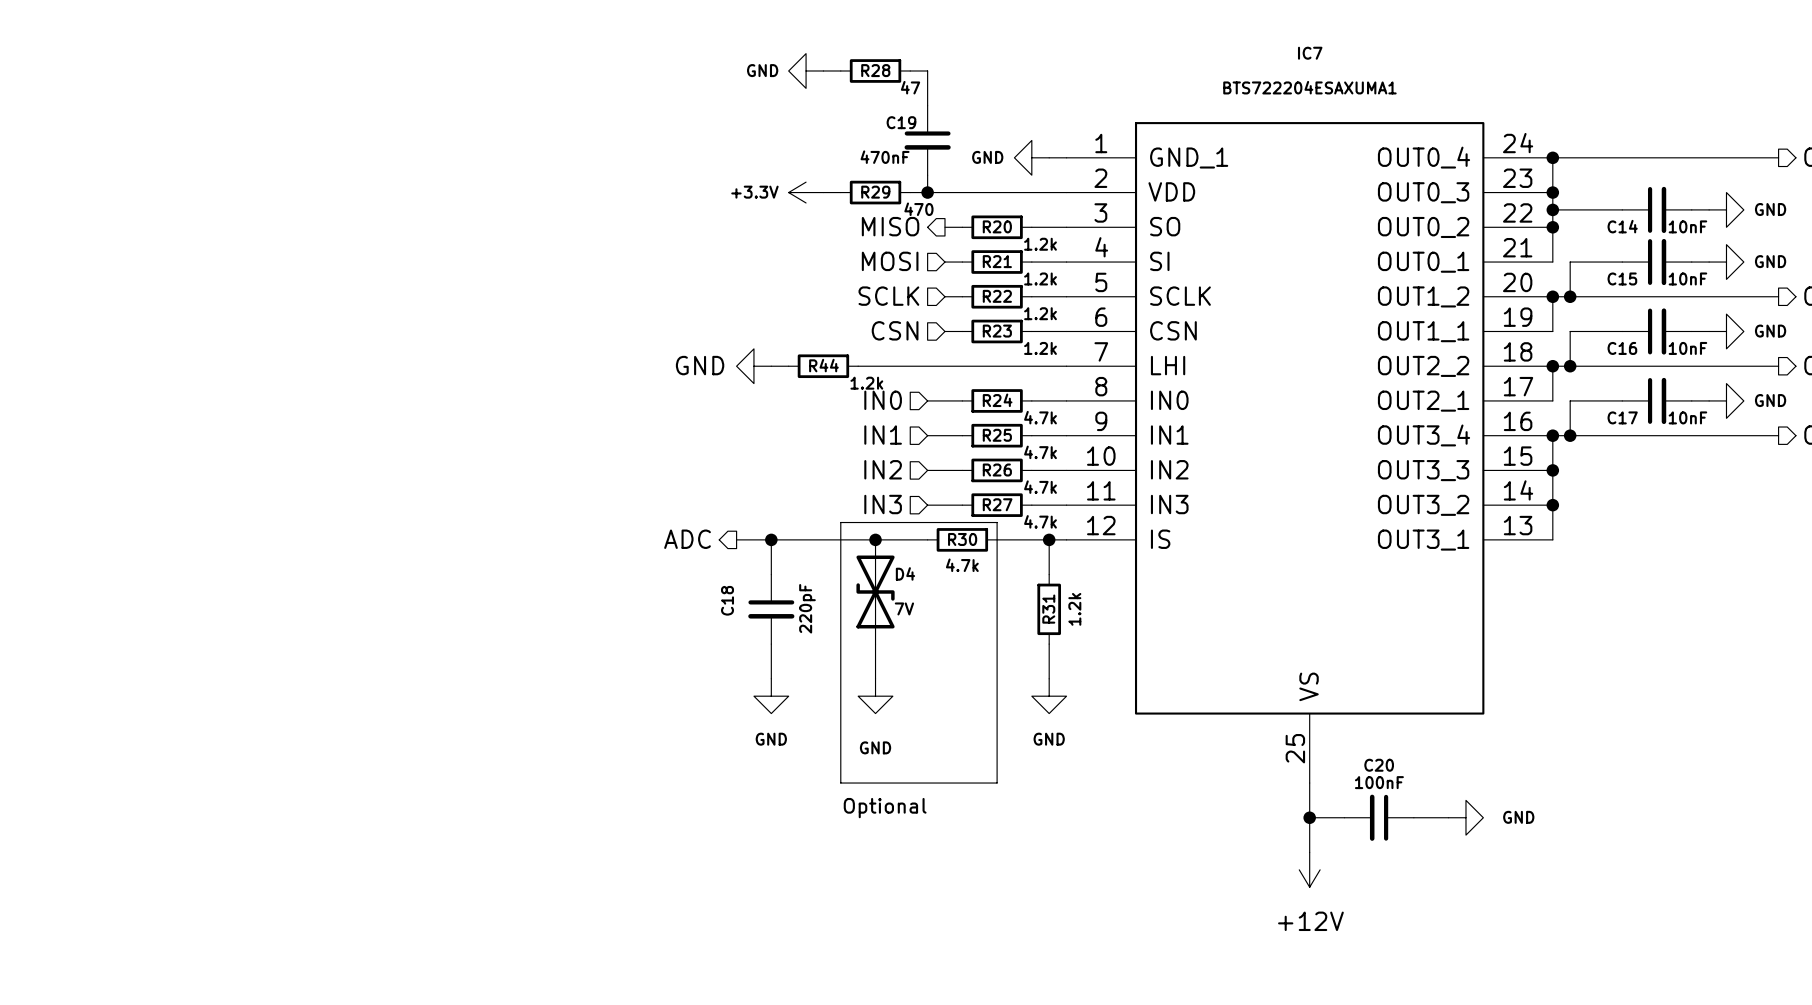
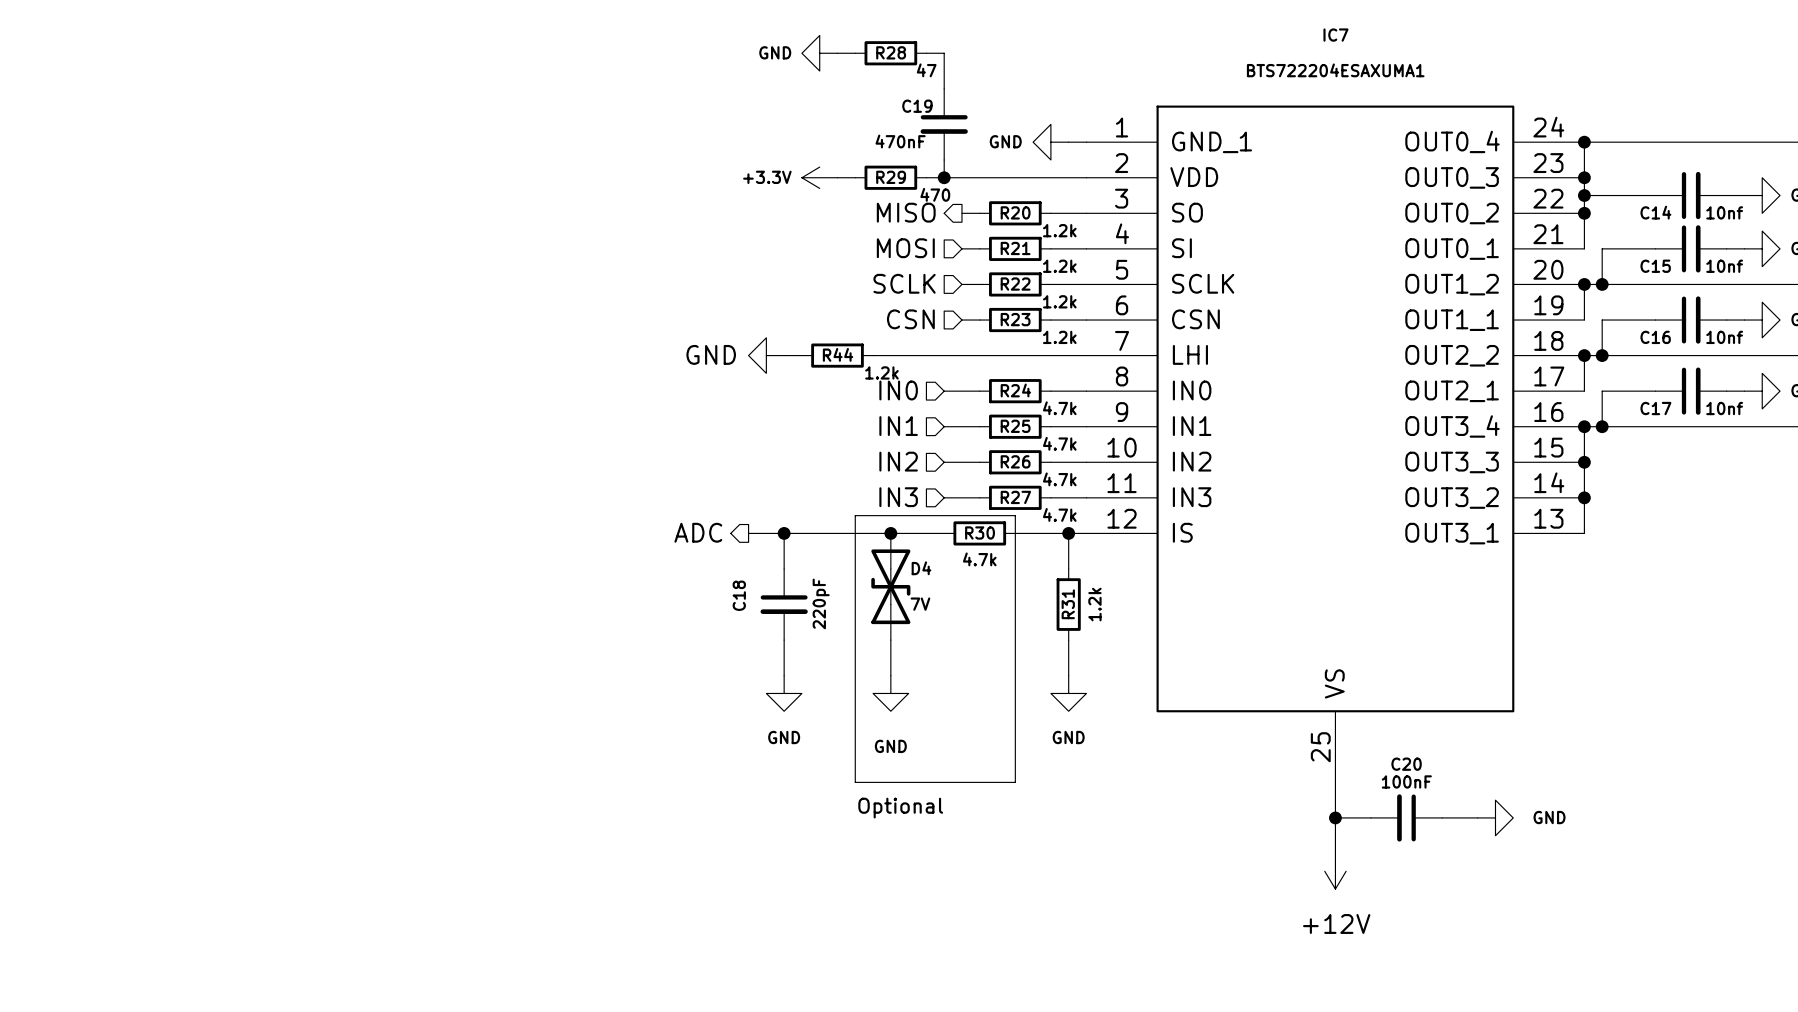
C14 value: 10nF (1687, 226) -> 10nf (1724, 212)
C15 value: 10nF (1687, 278) -> 10nf (1724, 266)
C16 value: 10nF (1687, 348) -> 10nf (1724, 337)
C17 value: 10nF (1687, 417) -> 10nf (1724, 408)

